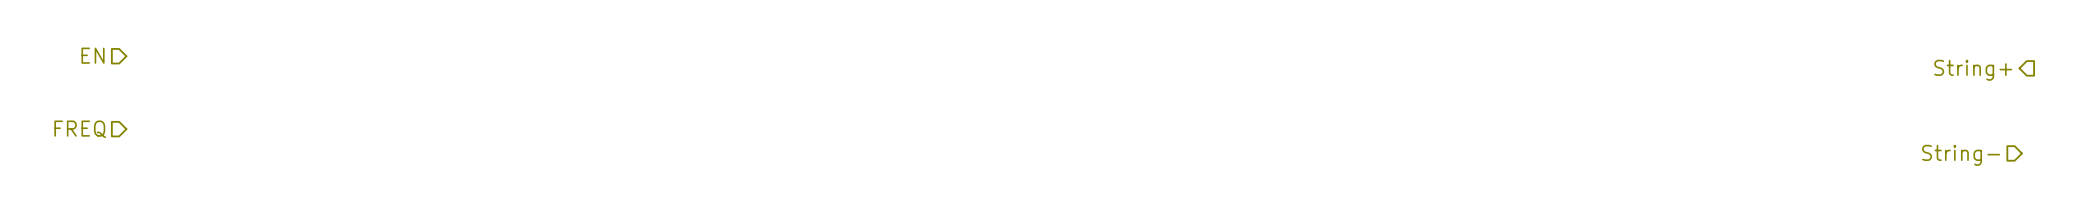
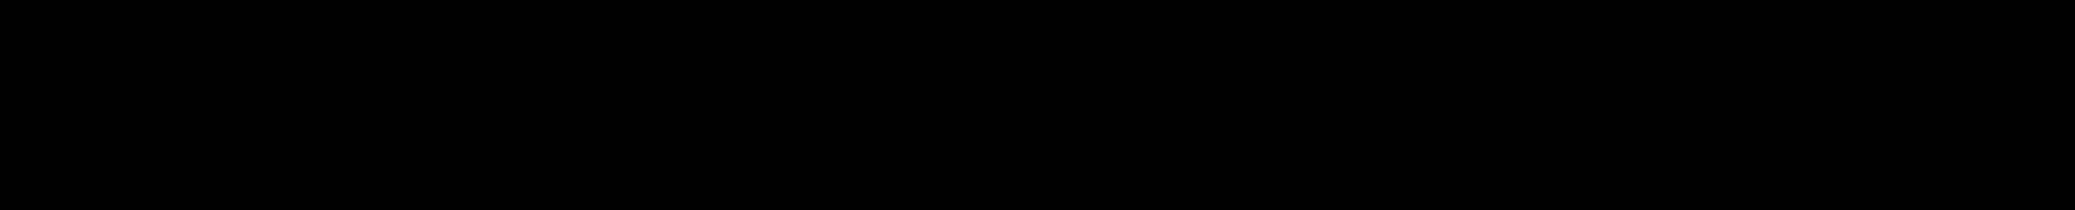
hierarchical label: EN (93, 55) -> none
hierarchical label: String+ (1973, 70) -> none
hierarchical label: FREQ (80, 129) -> none
hierarchical label: String- (1961, 155) -> none

